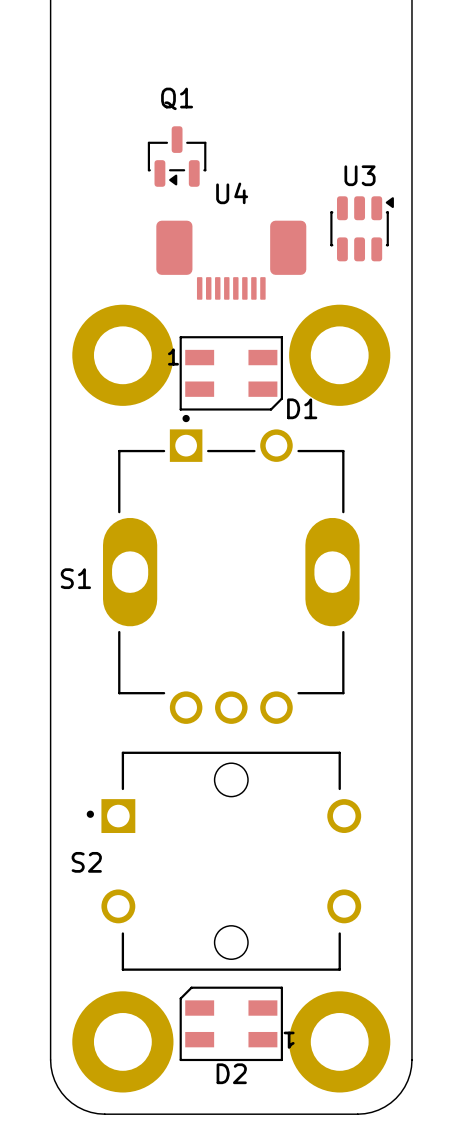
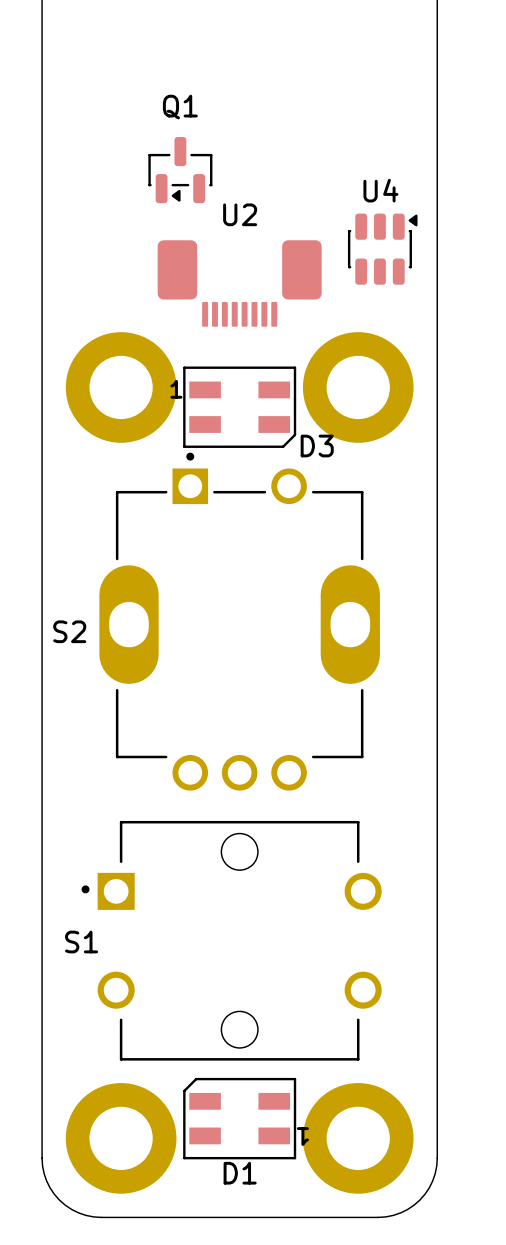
U3 name: U3 (360, 175) -> U4 (380, 190)
U4 name: U4 (232, 193) -> U2 (240, 214)
D1 name: D1 (302, 408) -> D3 (317, 446)
S1 name: S1 (75, 578) -> S2 (69, 631)
S2 name: S2 (86, 862) -> S1 (81, 942)
D2 name: D2 (231, 1073) -> D1 (240, 1173)

